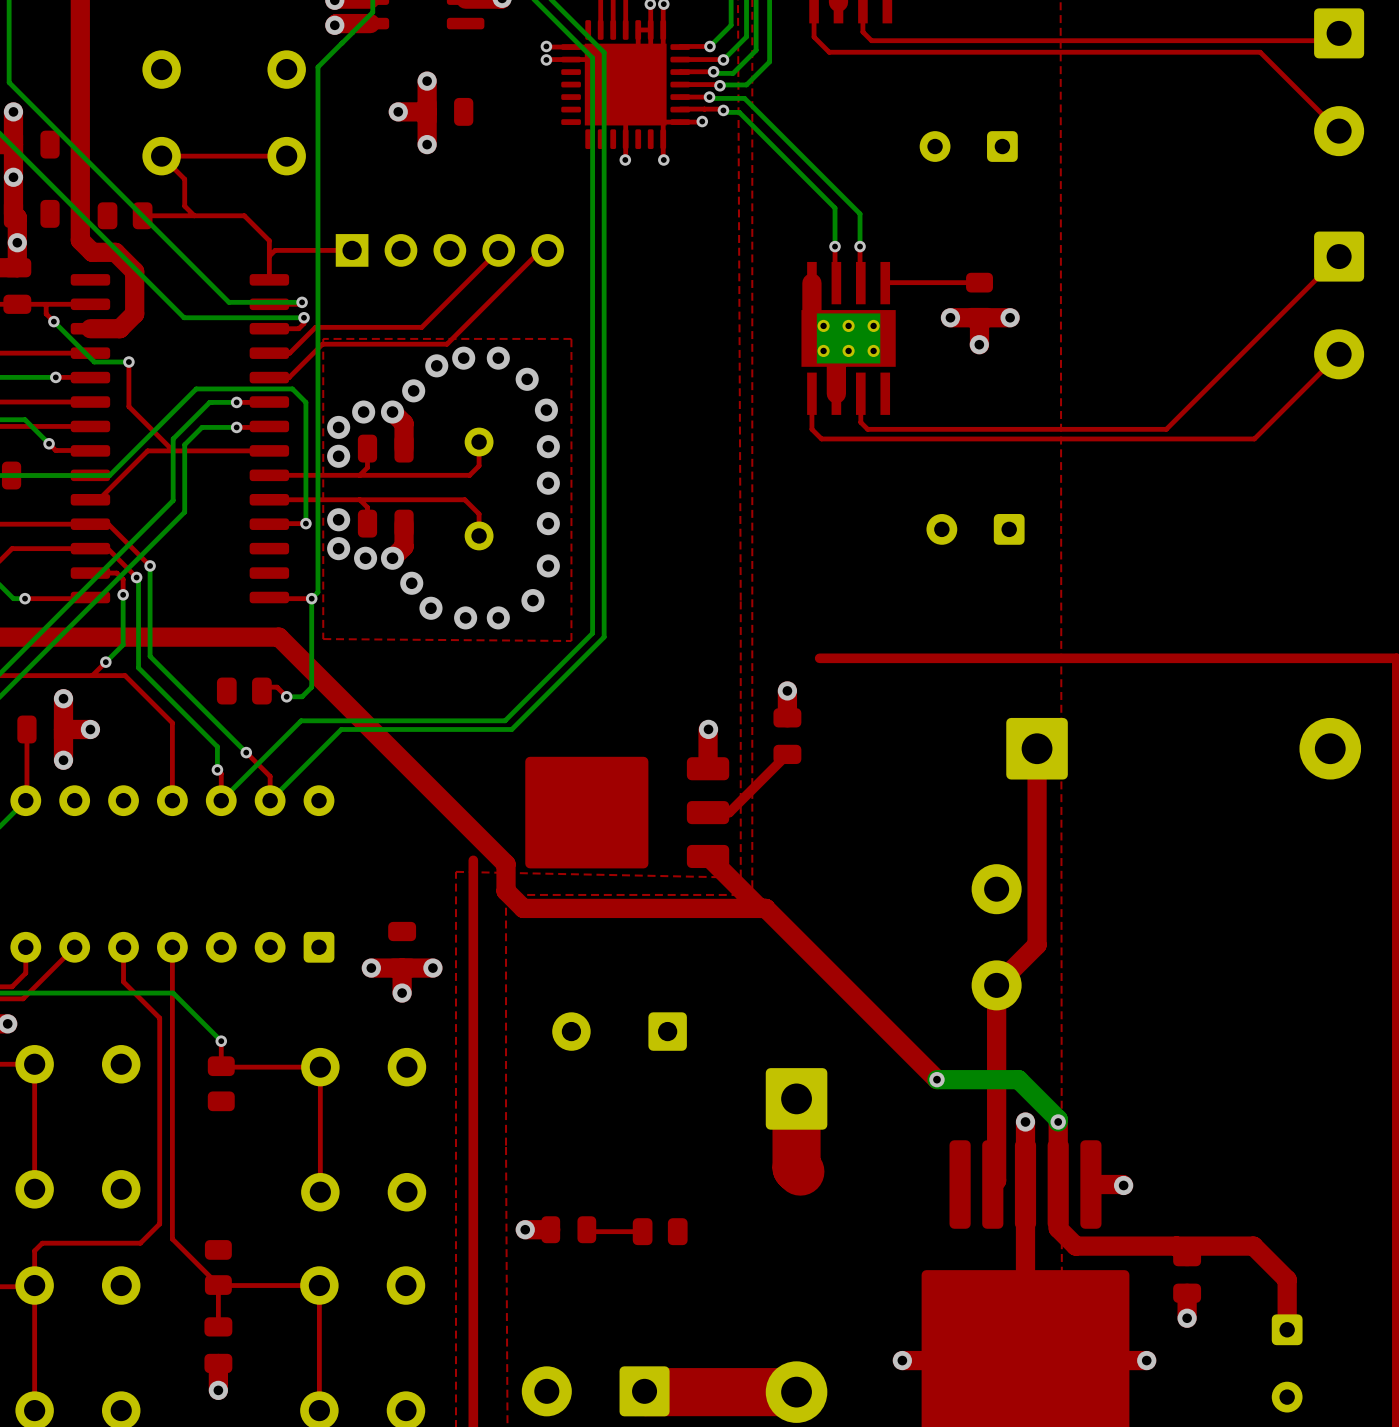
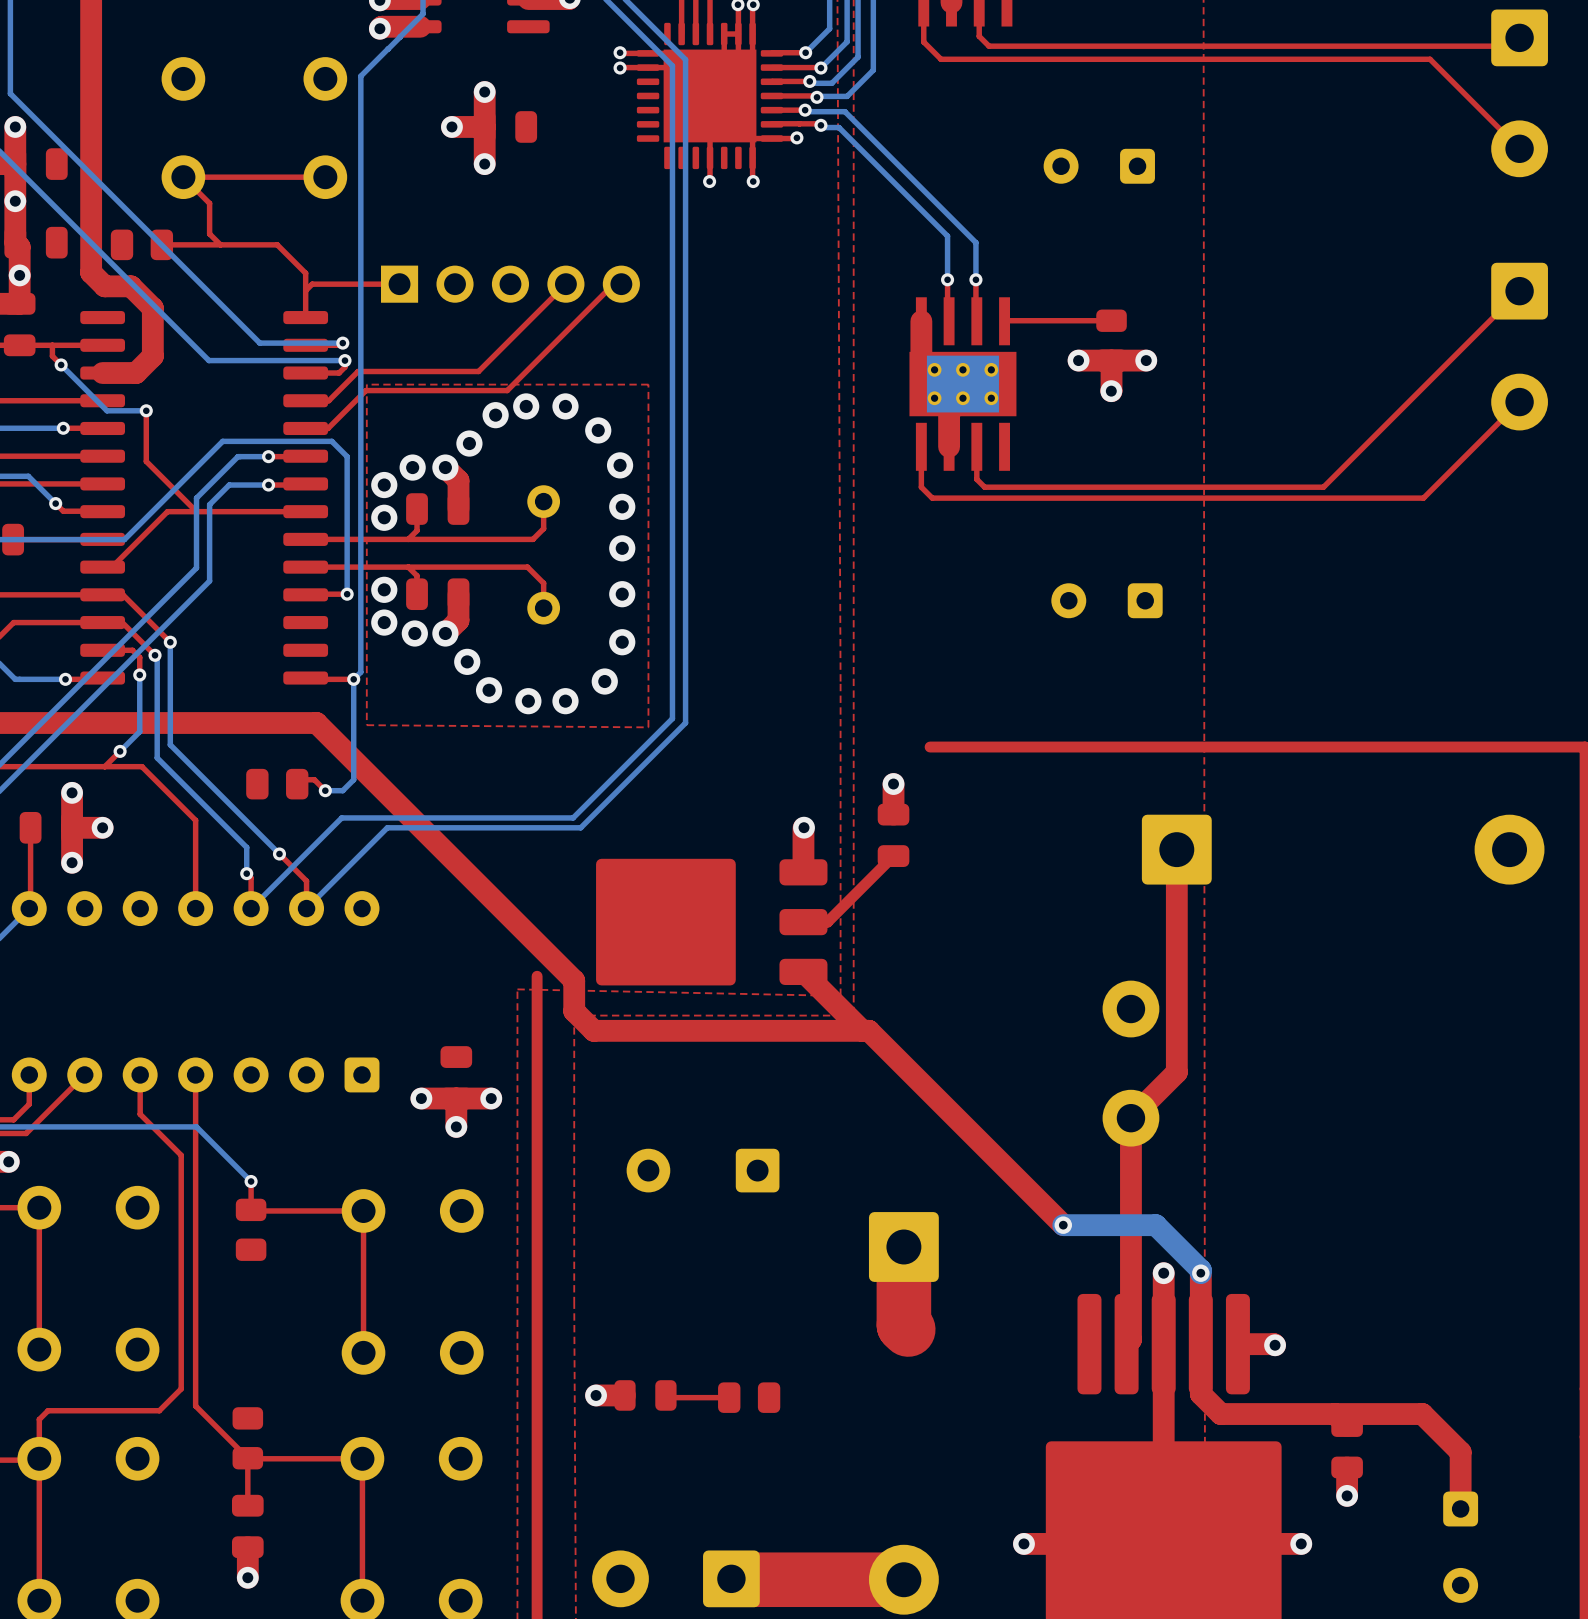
via position: (25, 598) -> (65, 679)
top track: (57, 598) (25, 598) -> none
bottom track: none -> (65, 679) (28, 679)

